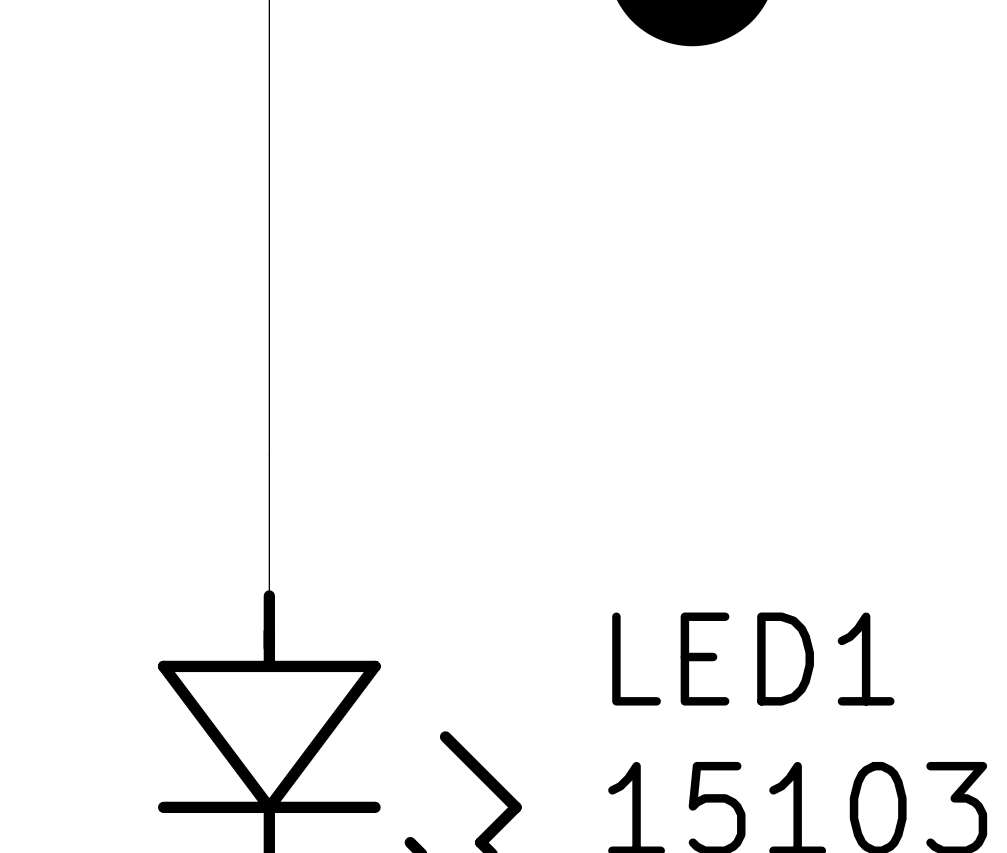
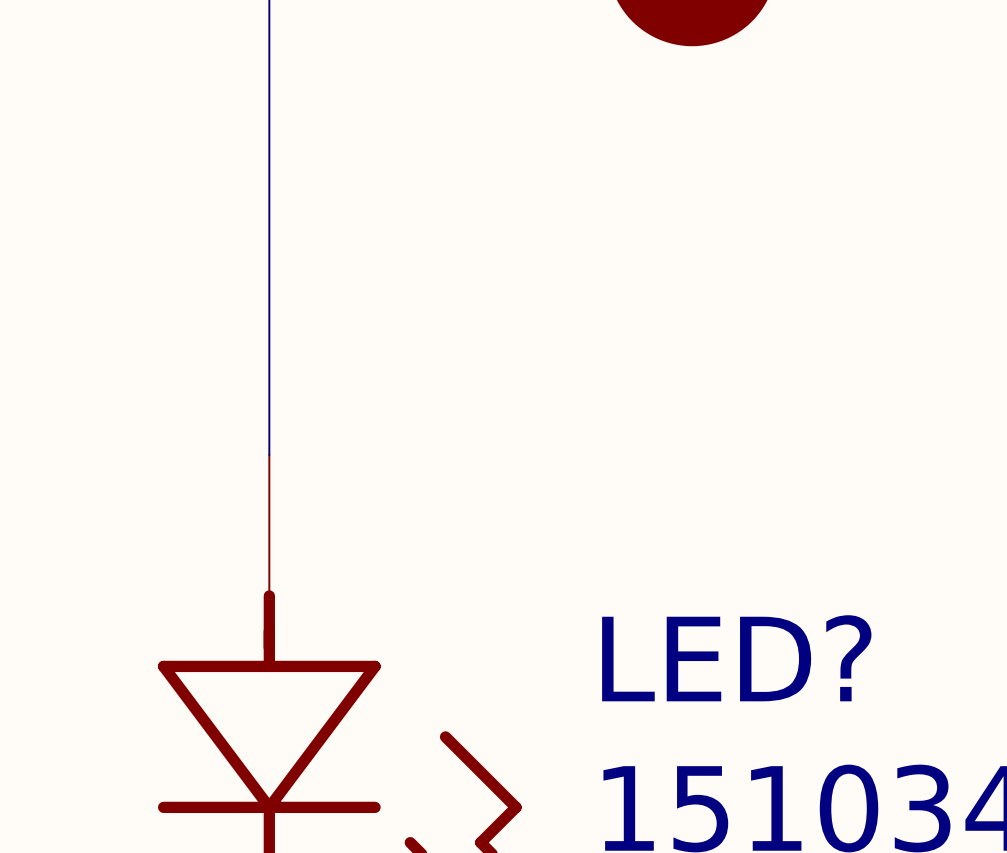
LED1 name: LED1 (753, 659) -> LED? (736, 658)

